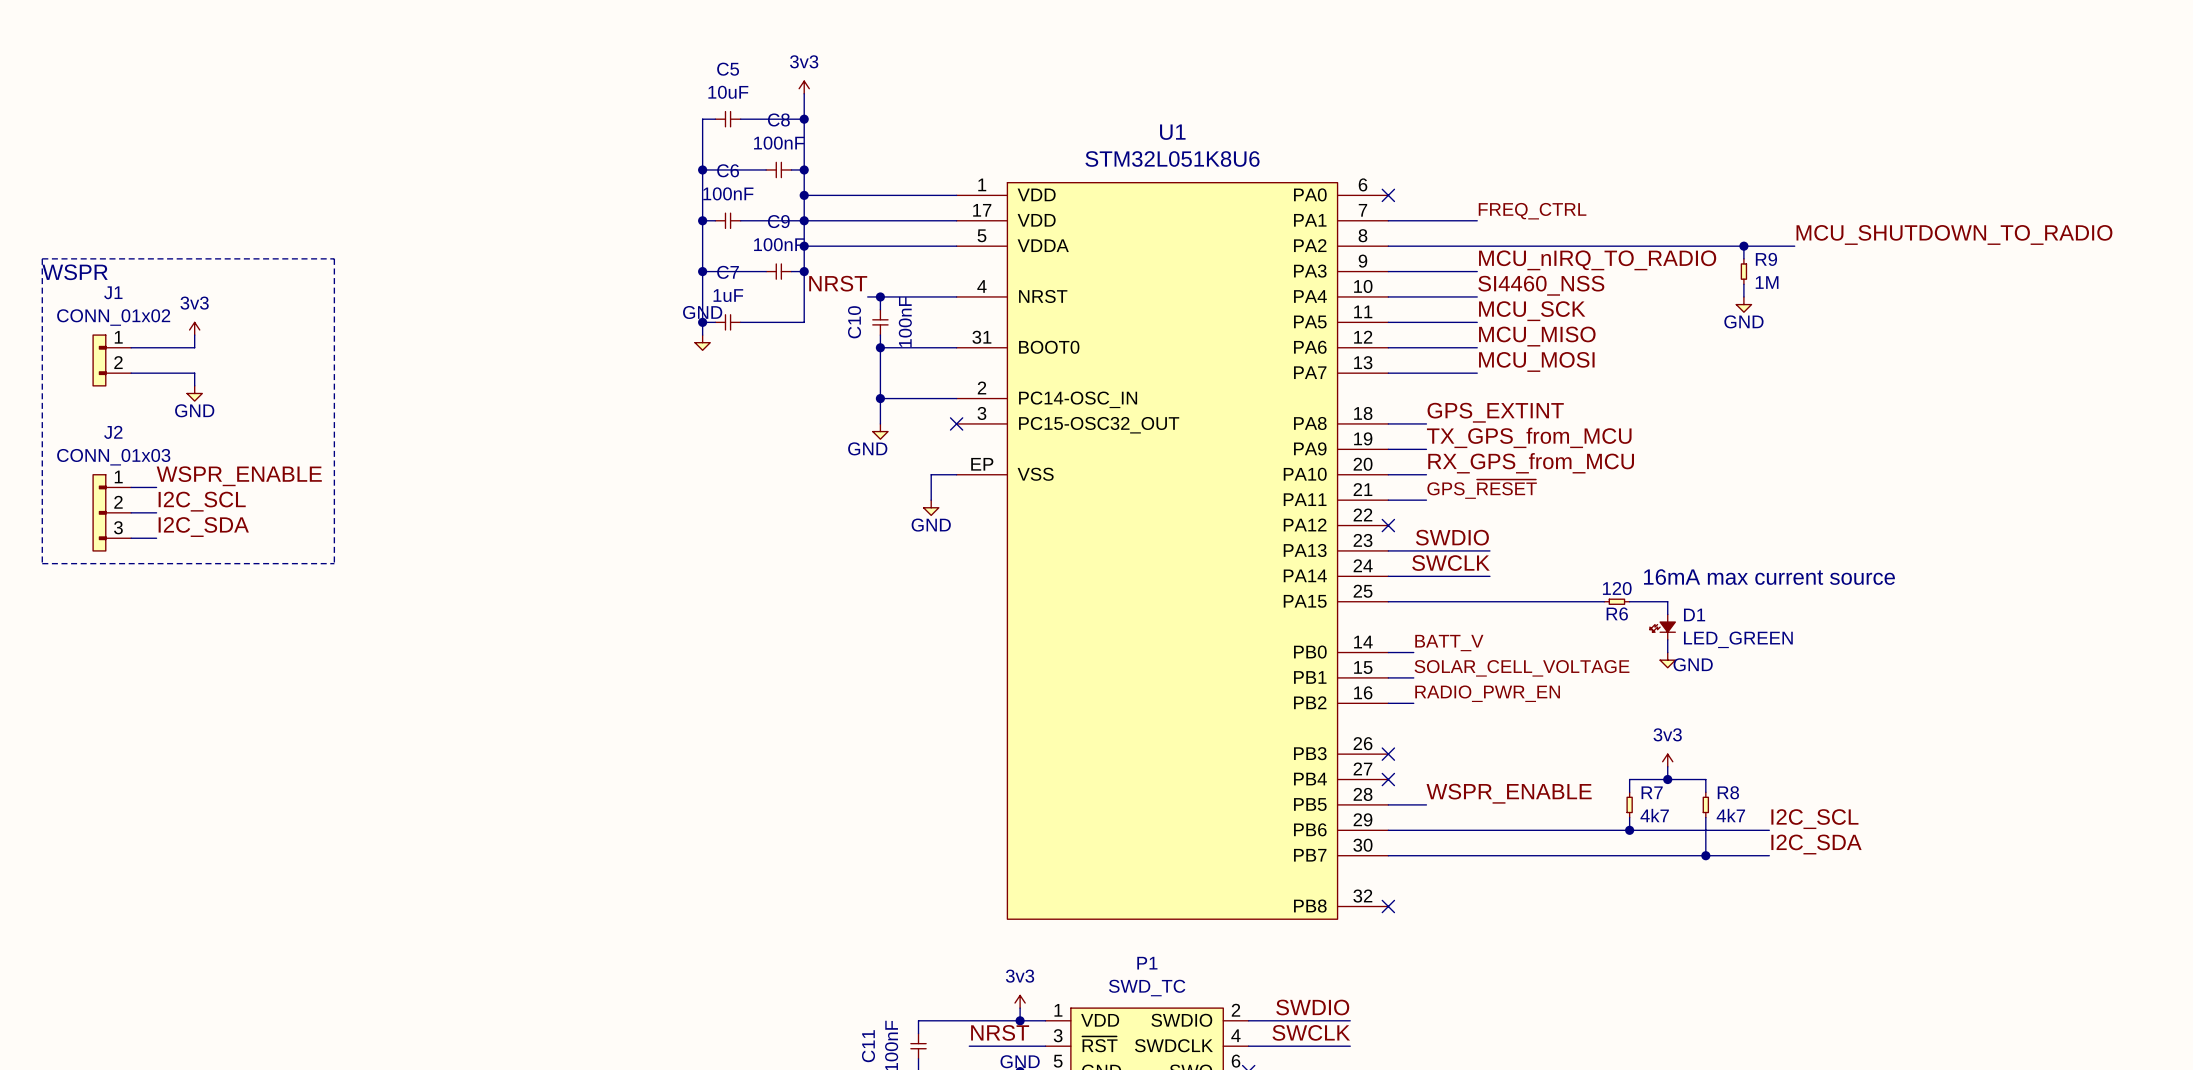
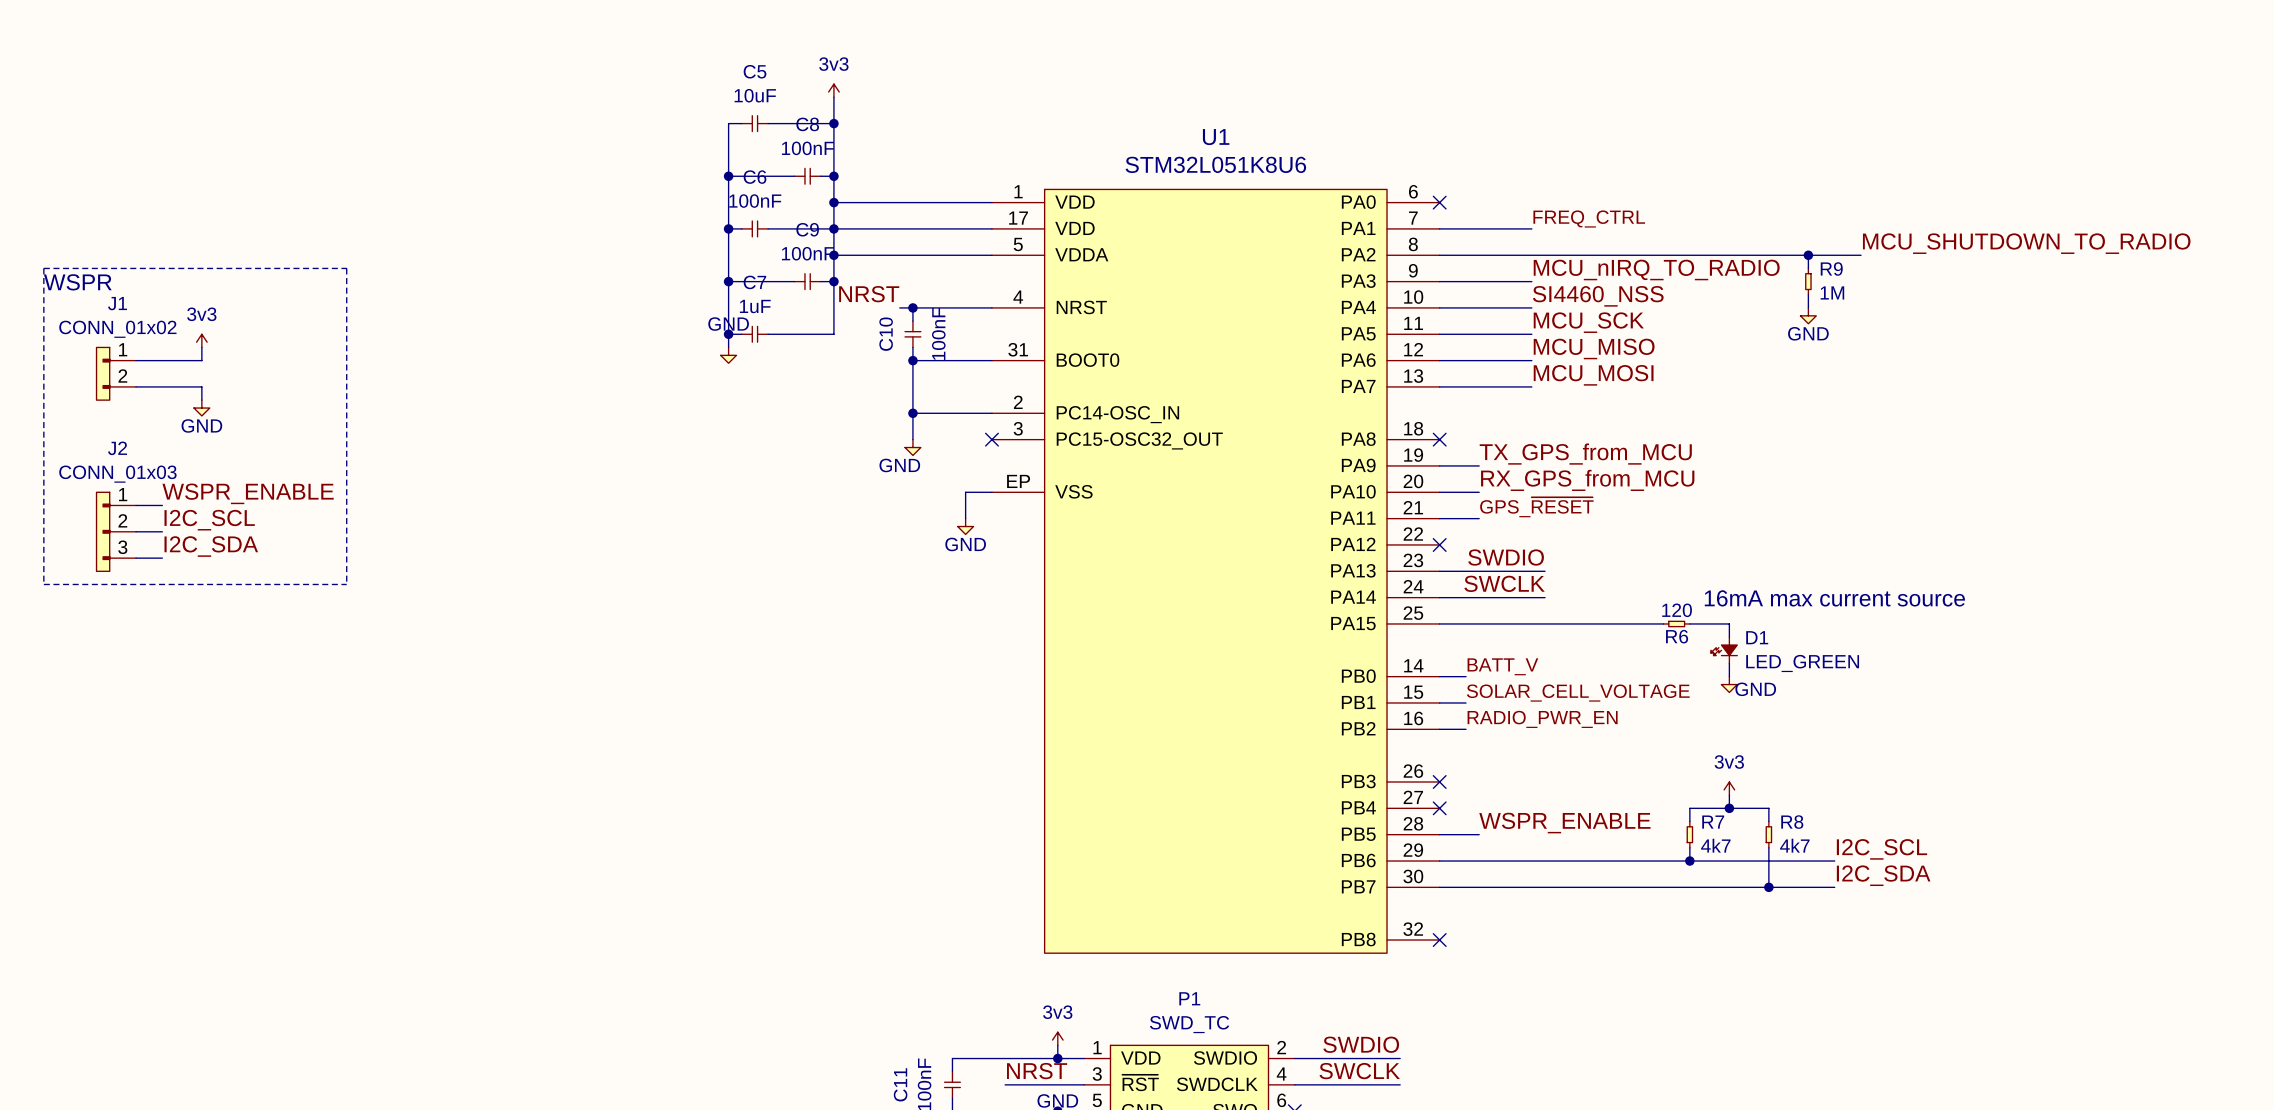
label: GPS_EXTINT (1495, 412) -> none
wire: (1388, 423) (1426, 423) -> none
no-connect mark: none -> (1439, 439)

